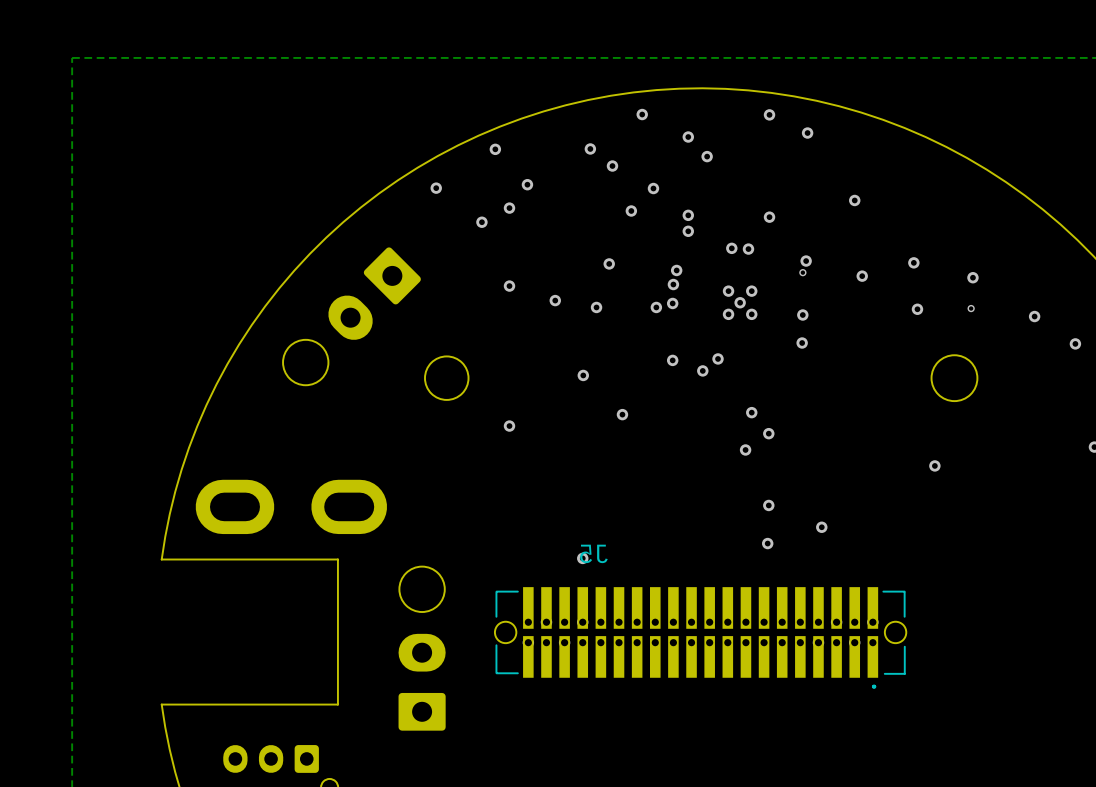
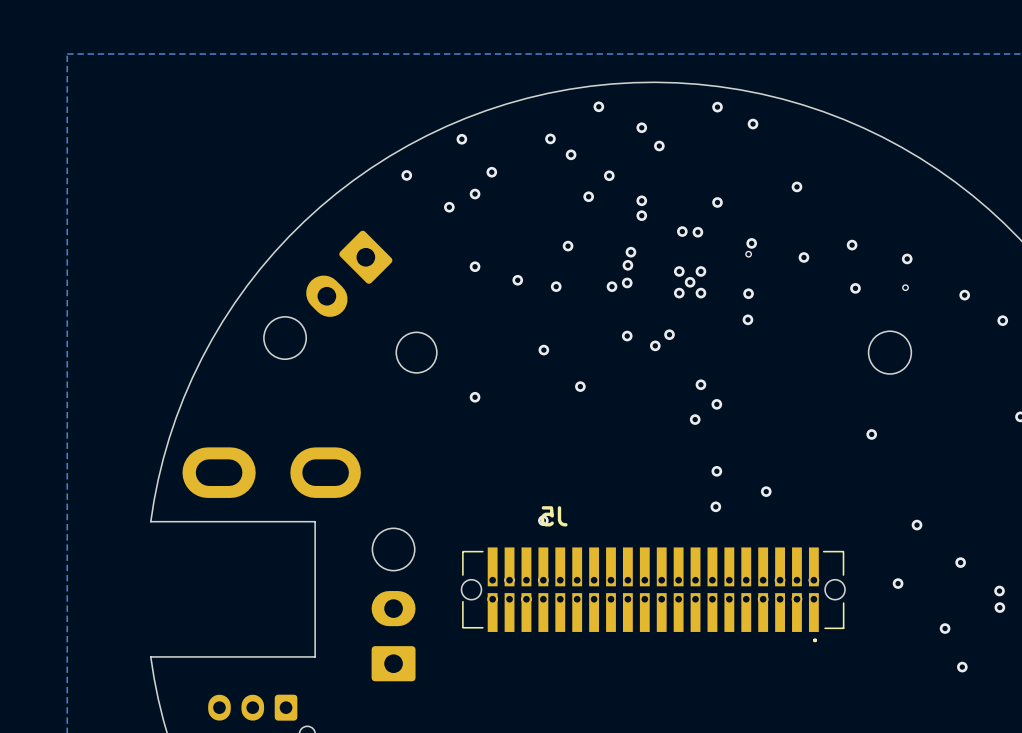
via: none -> (917, 525)
via: none -> (960, 562)
via: none -> (898, 583)
via: none -> (999, 591)
via: none -> (999, 607)
via: none -> (945, 628)
via: none -> (962, 667)

